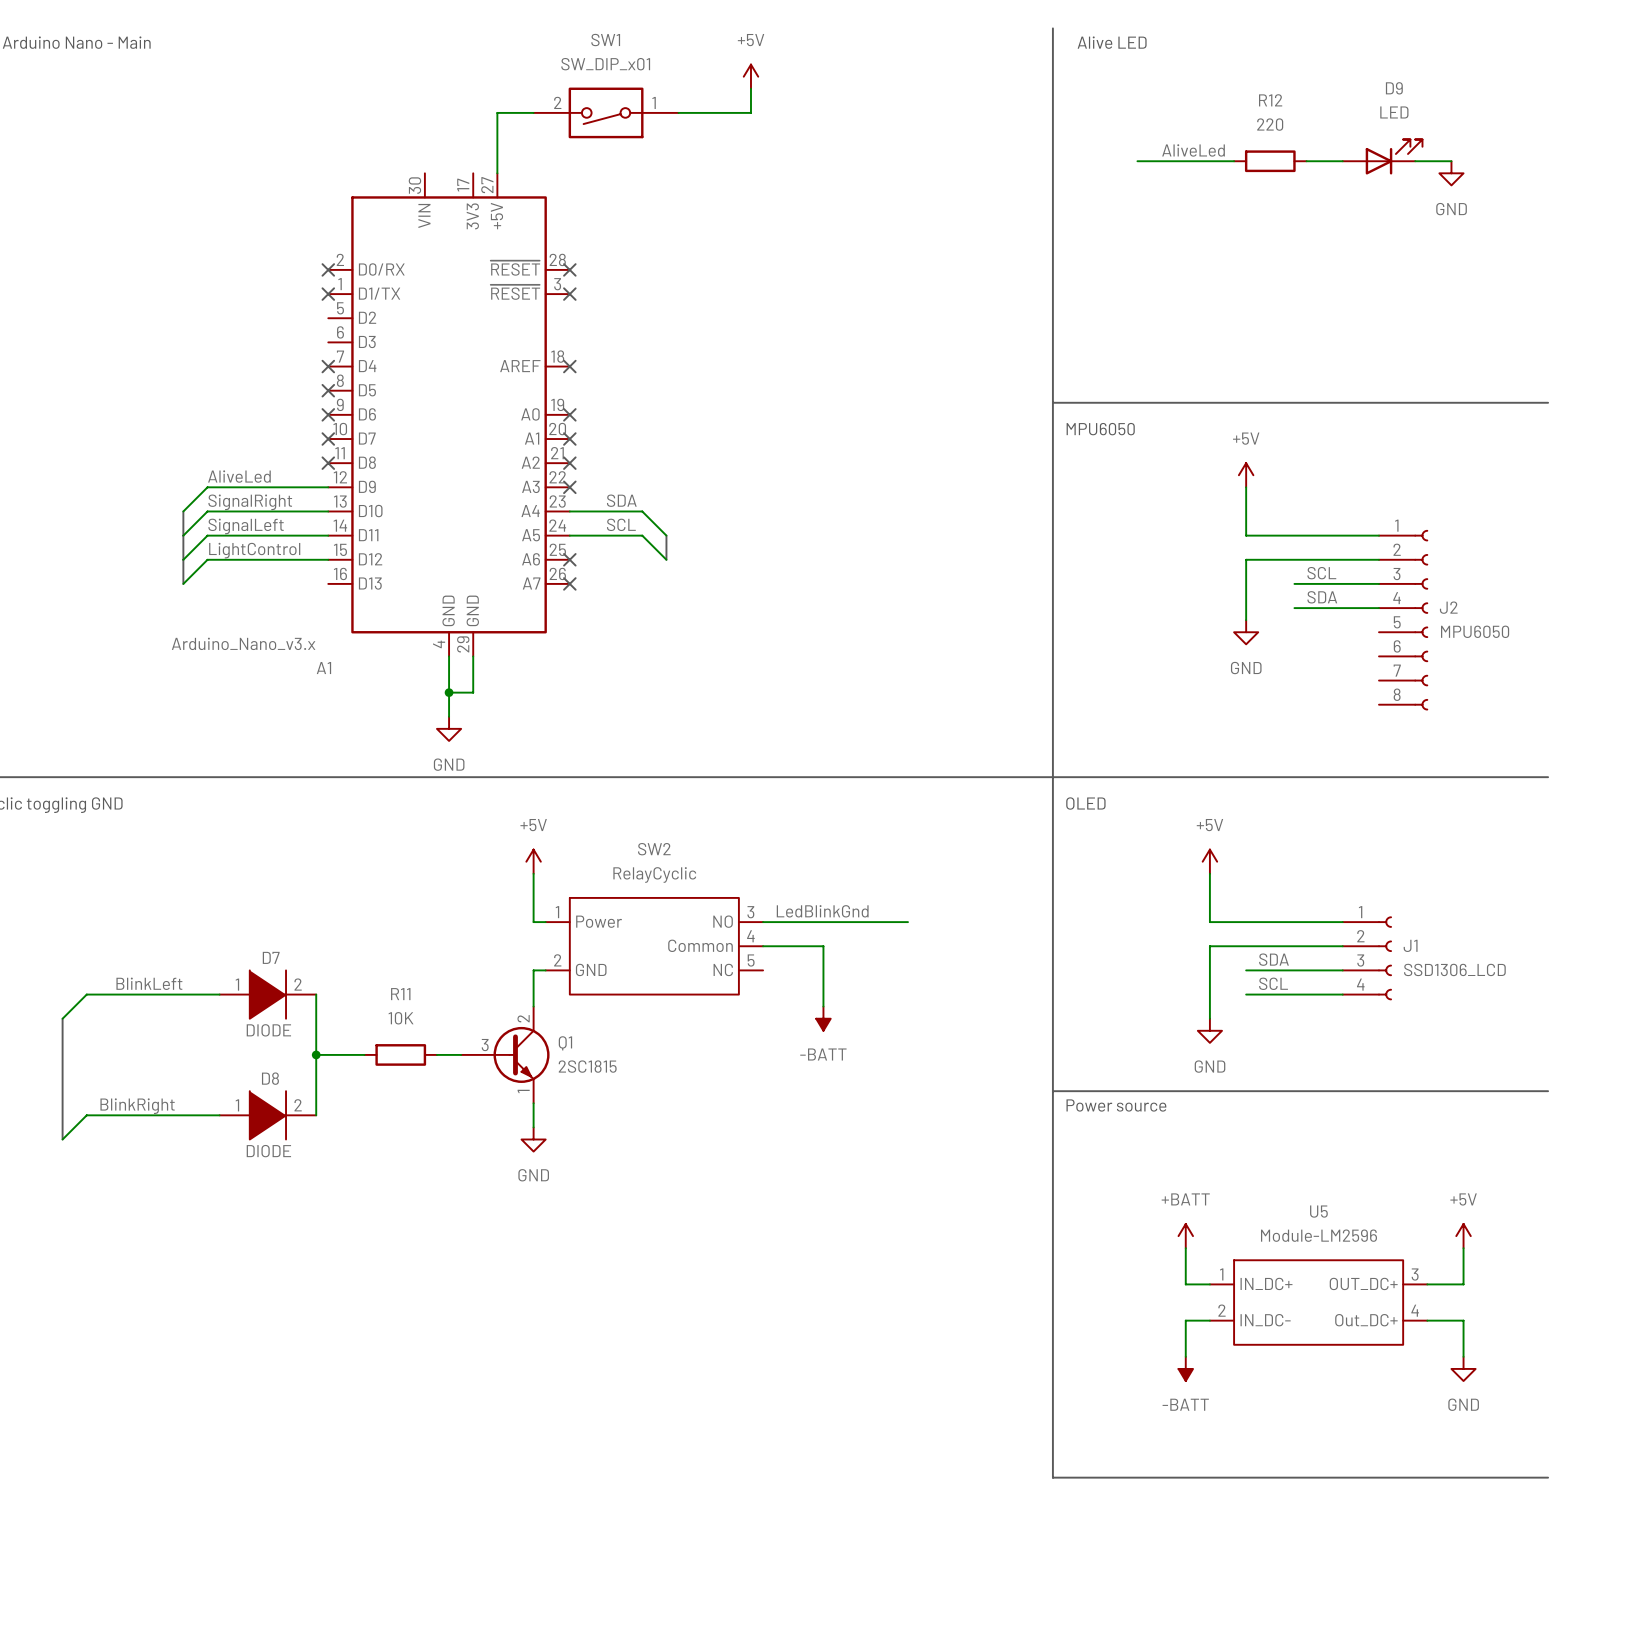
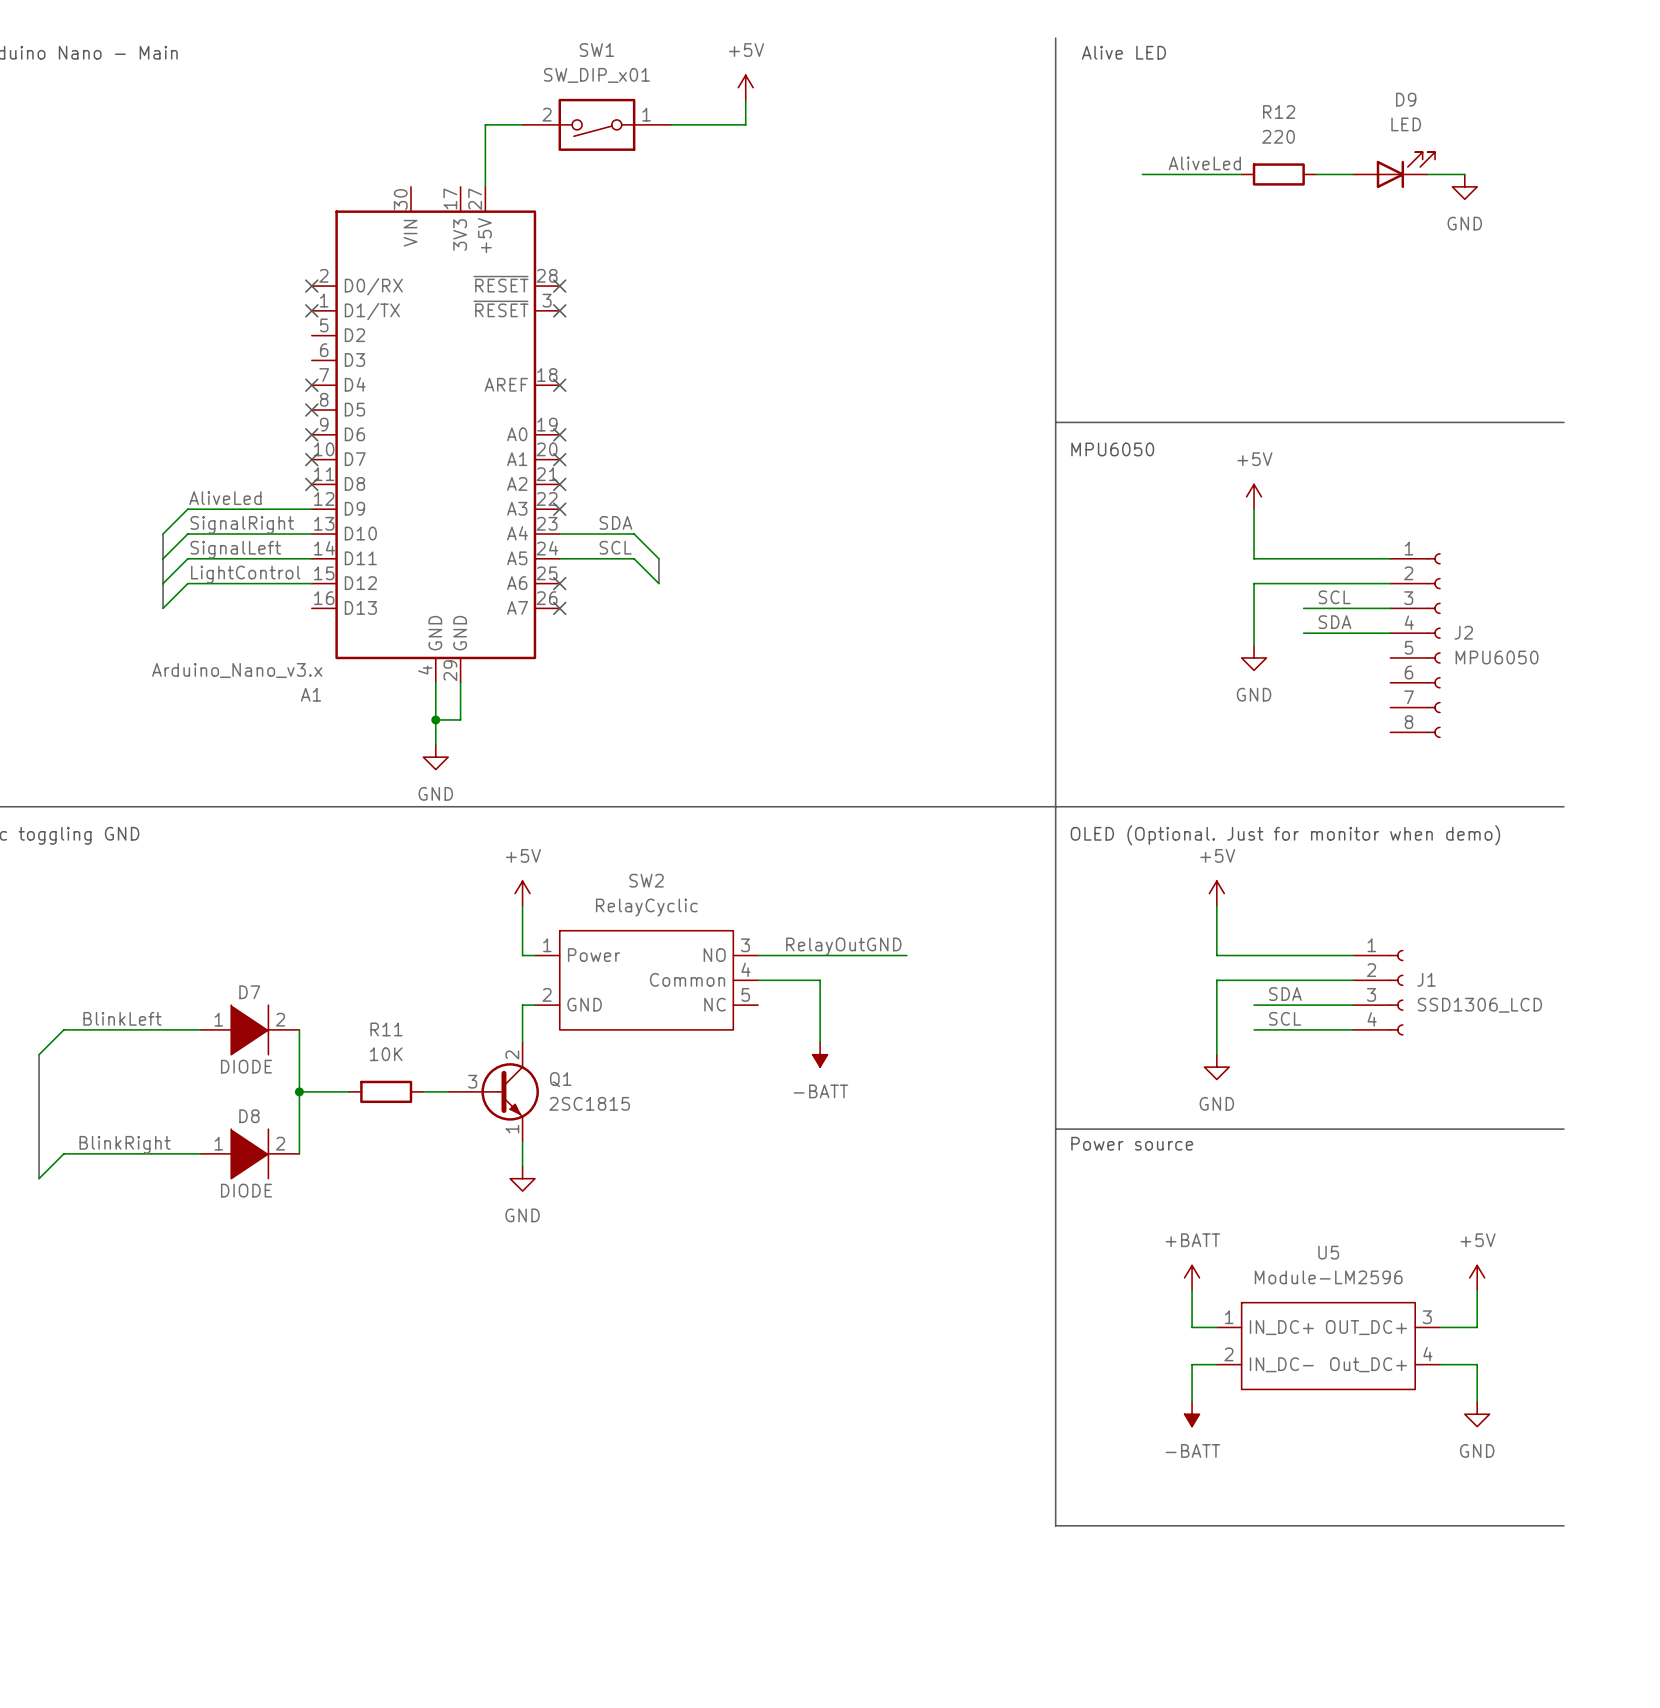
text: OLED (1085, 803) -> OLED (Optional. Just for monitor when demo) (1285, 835)
label: LedBlinkGnd (822, 911) -> none
label: none -> RelayOutGND (843, 946)

